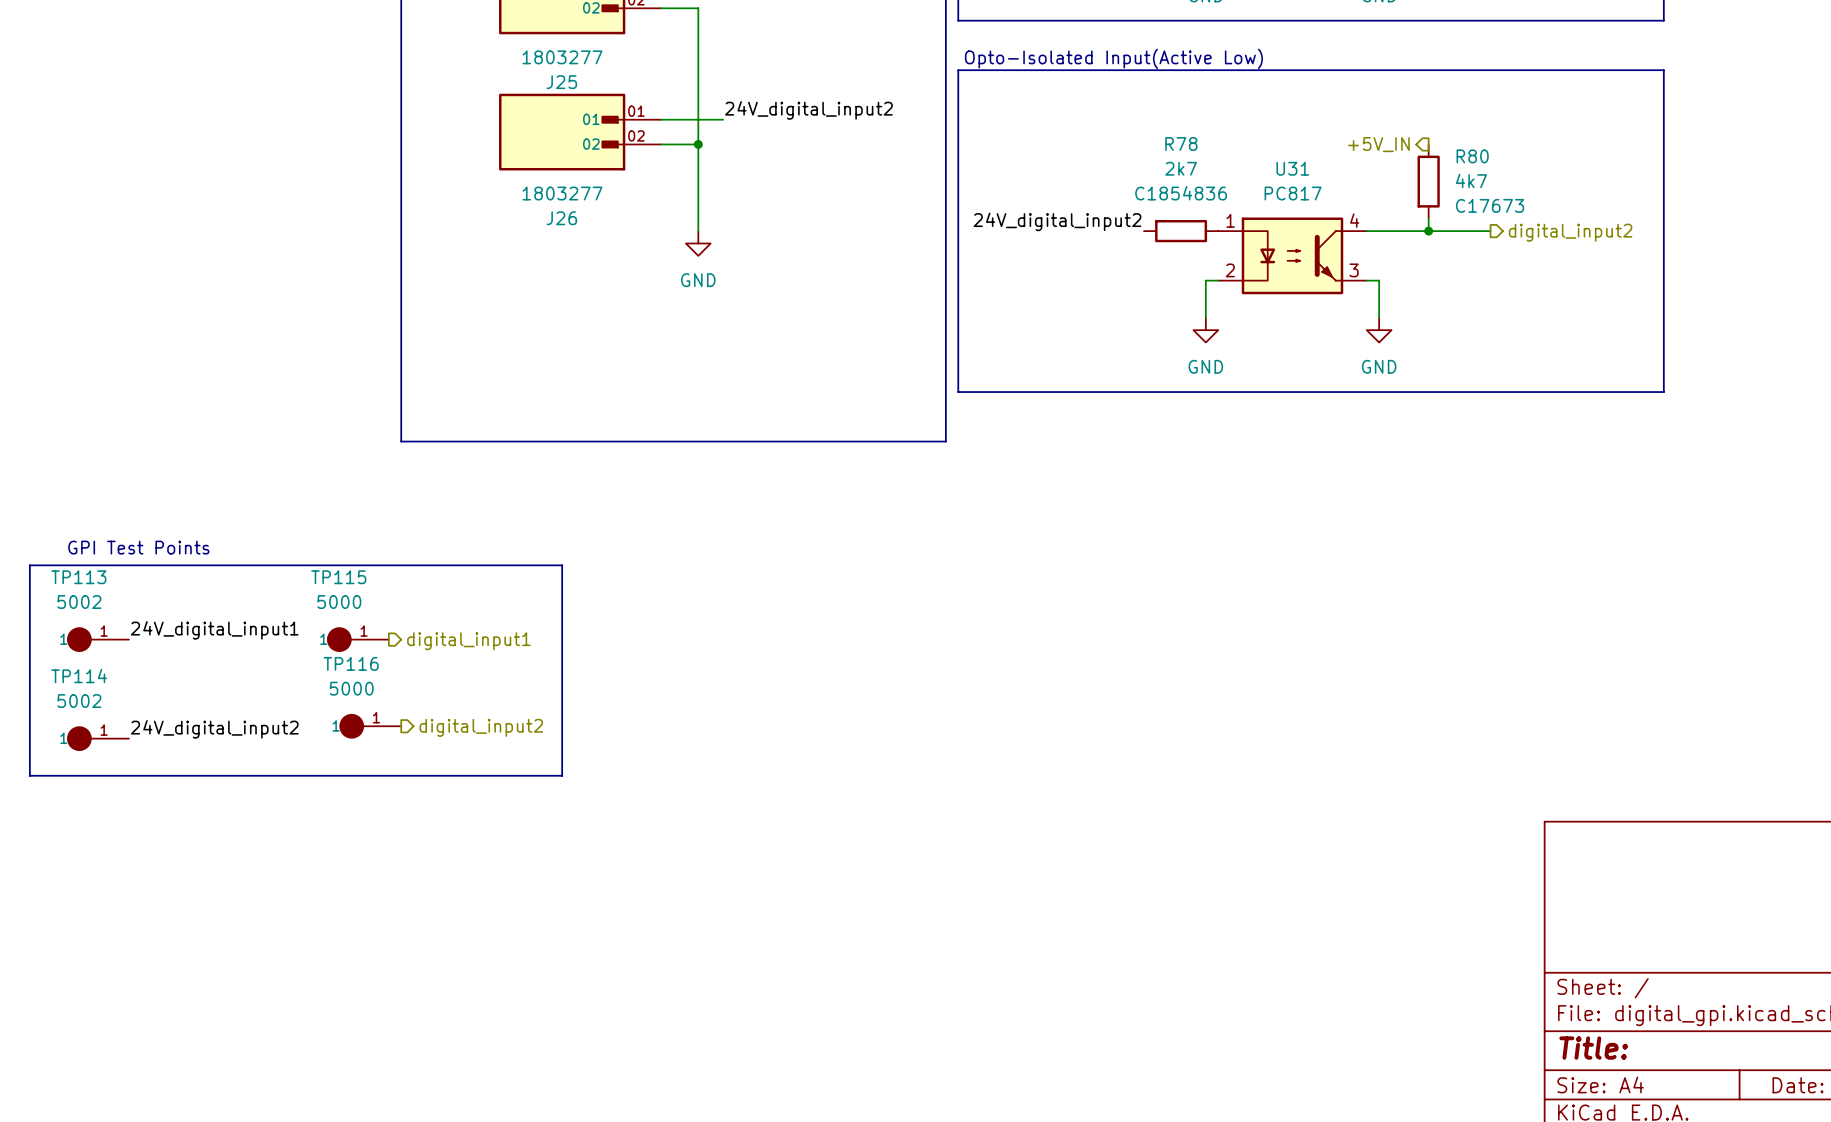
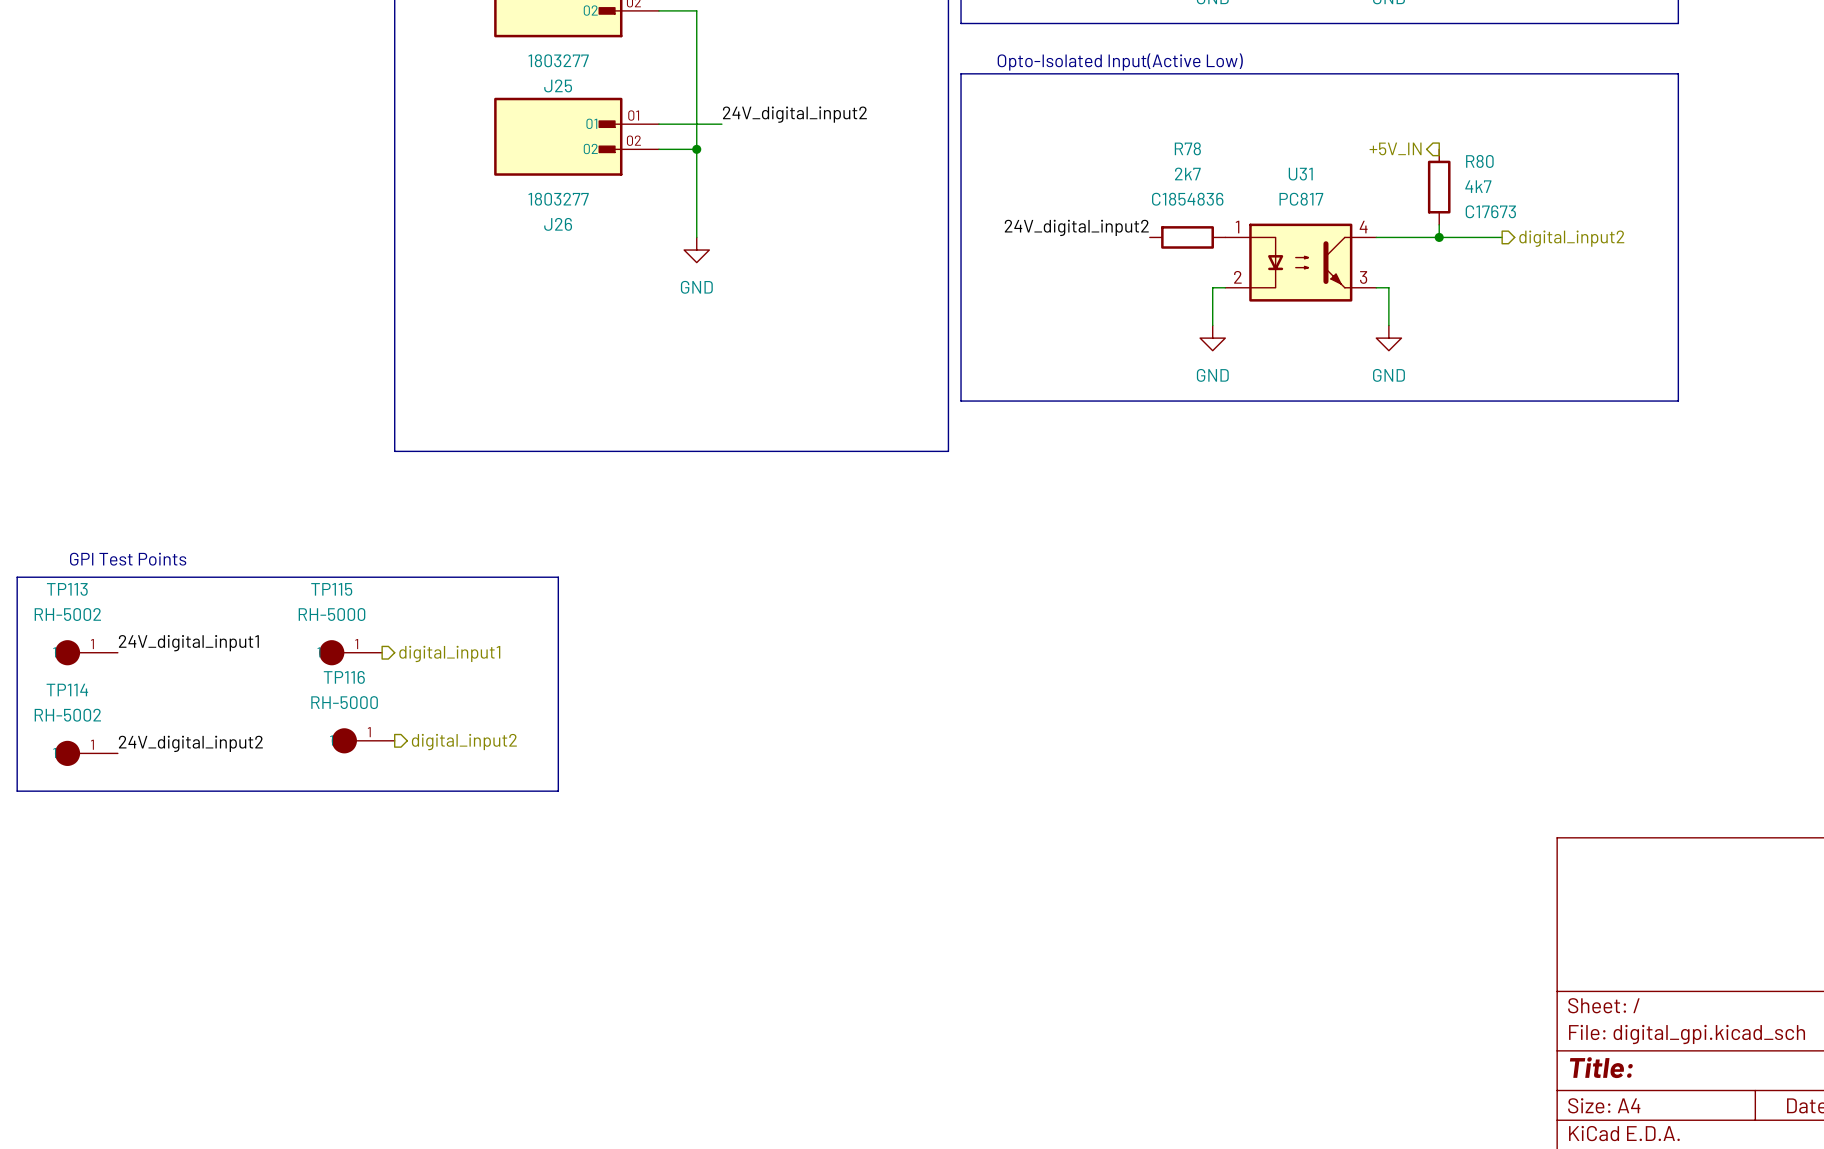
TP113 value: 5002 (79, 602) -> RH-5002 (67, 614)
TP115 value: 5000 (339, 602) -> RH-5000 (332, 614)
TP116 value: 5000 (351, 688) -> RH-5000 (344, 702)
TP114 value: 5002 (79, 701) -> RH-5002 (67, 715)

